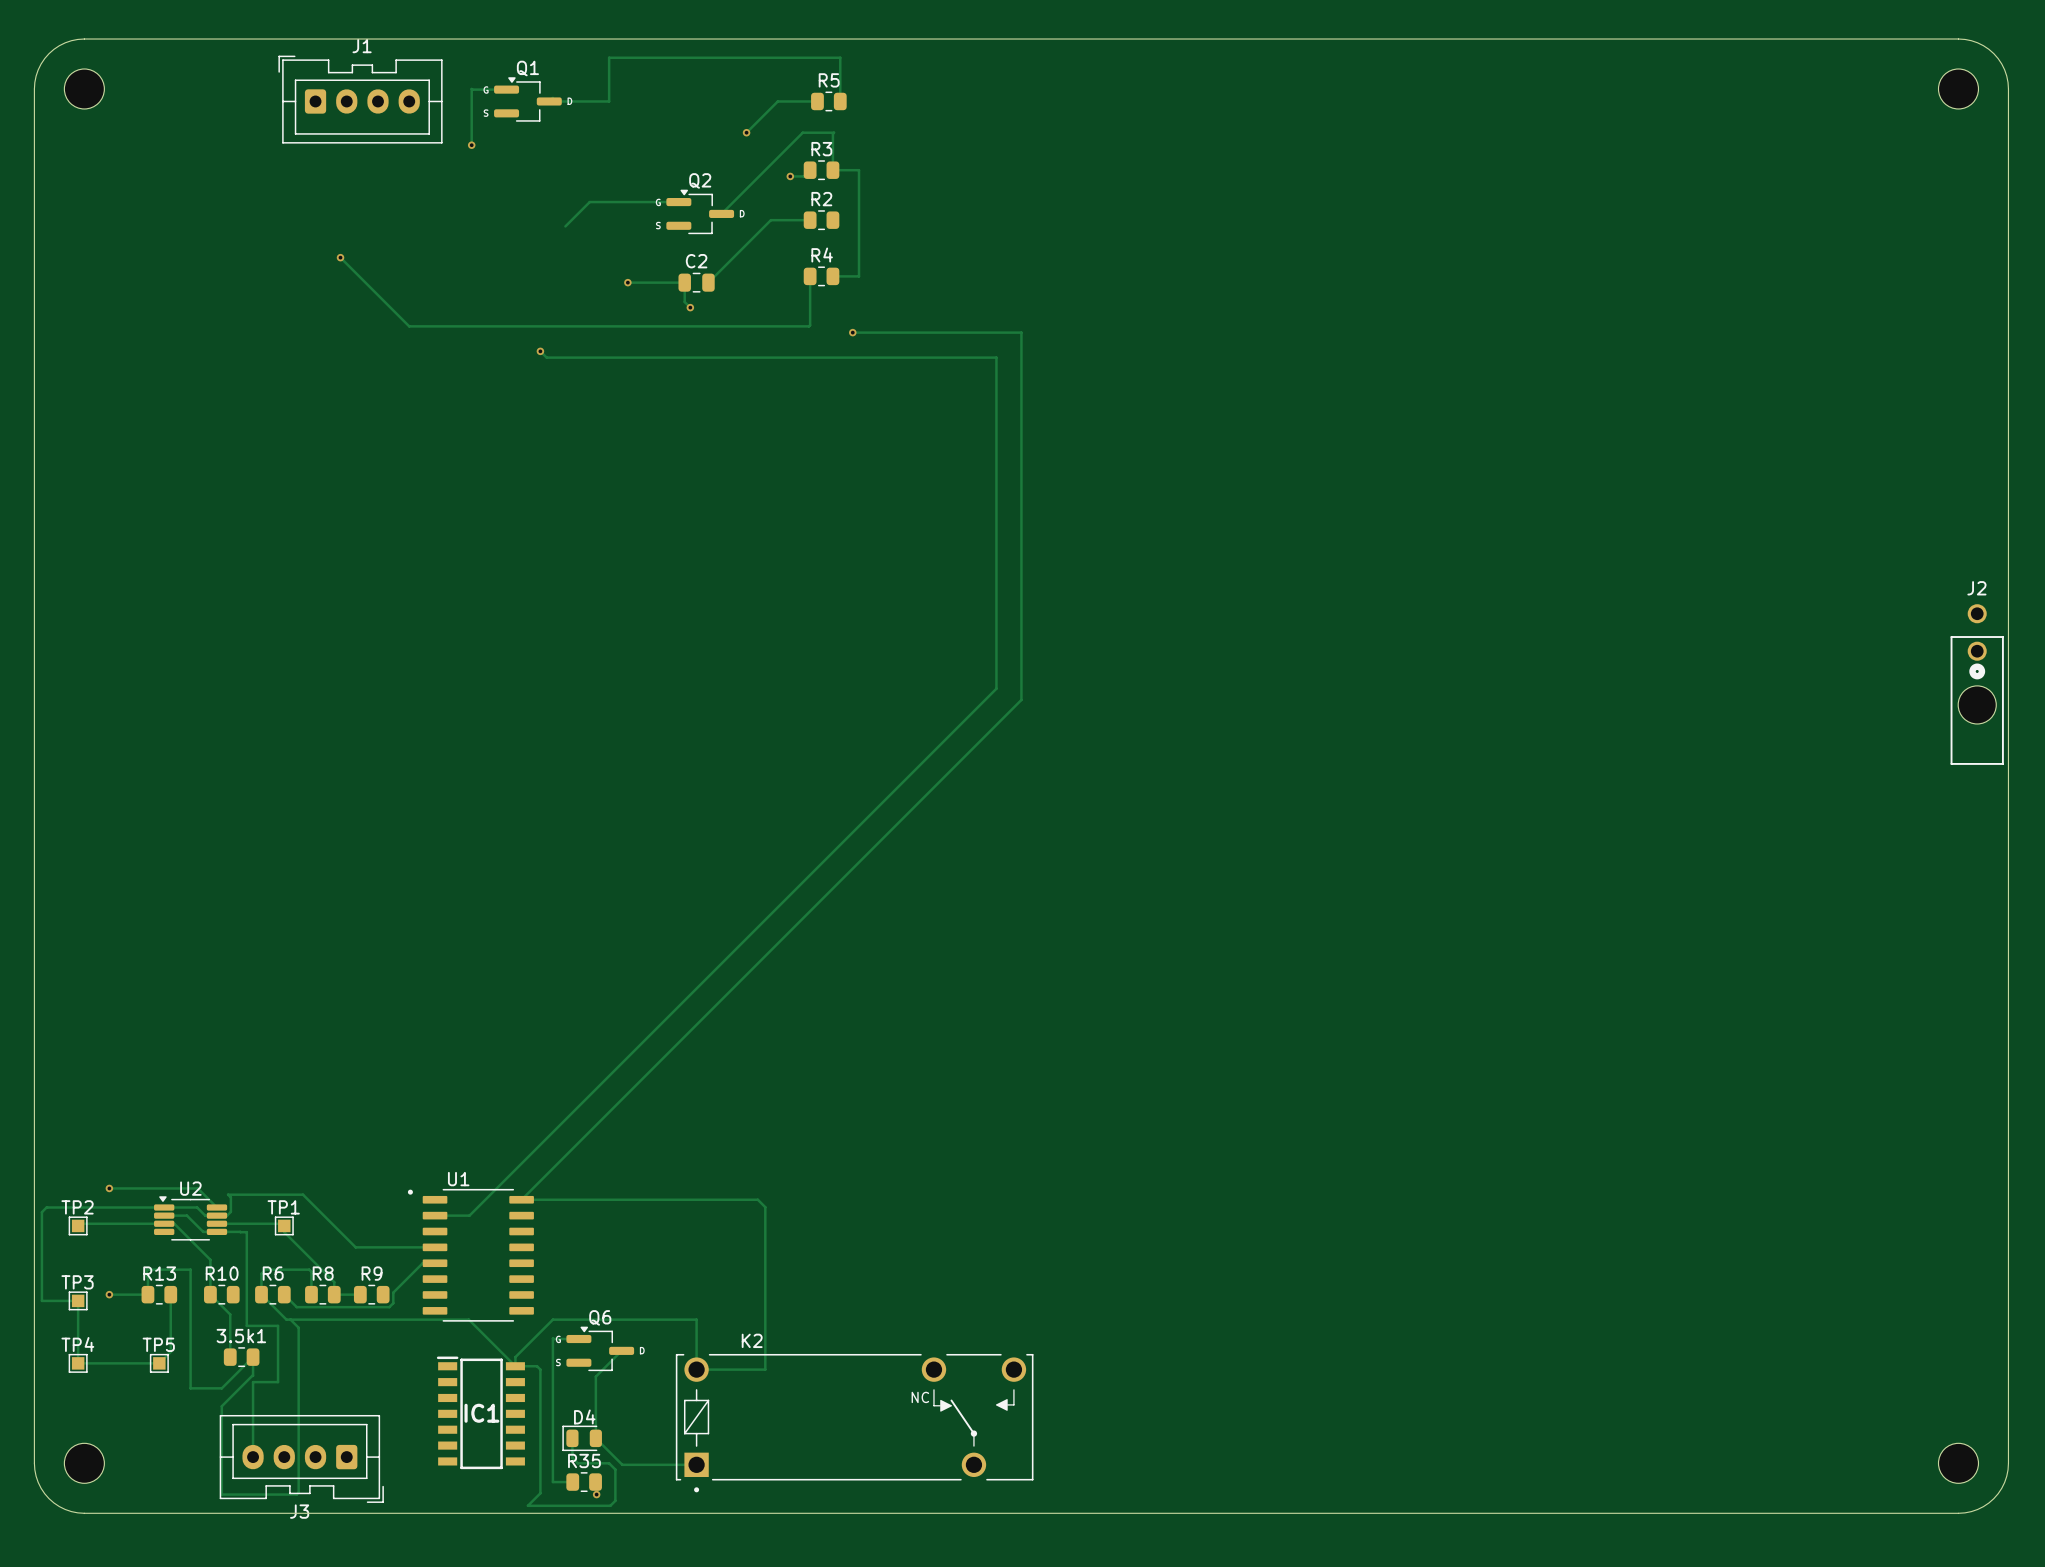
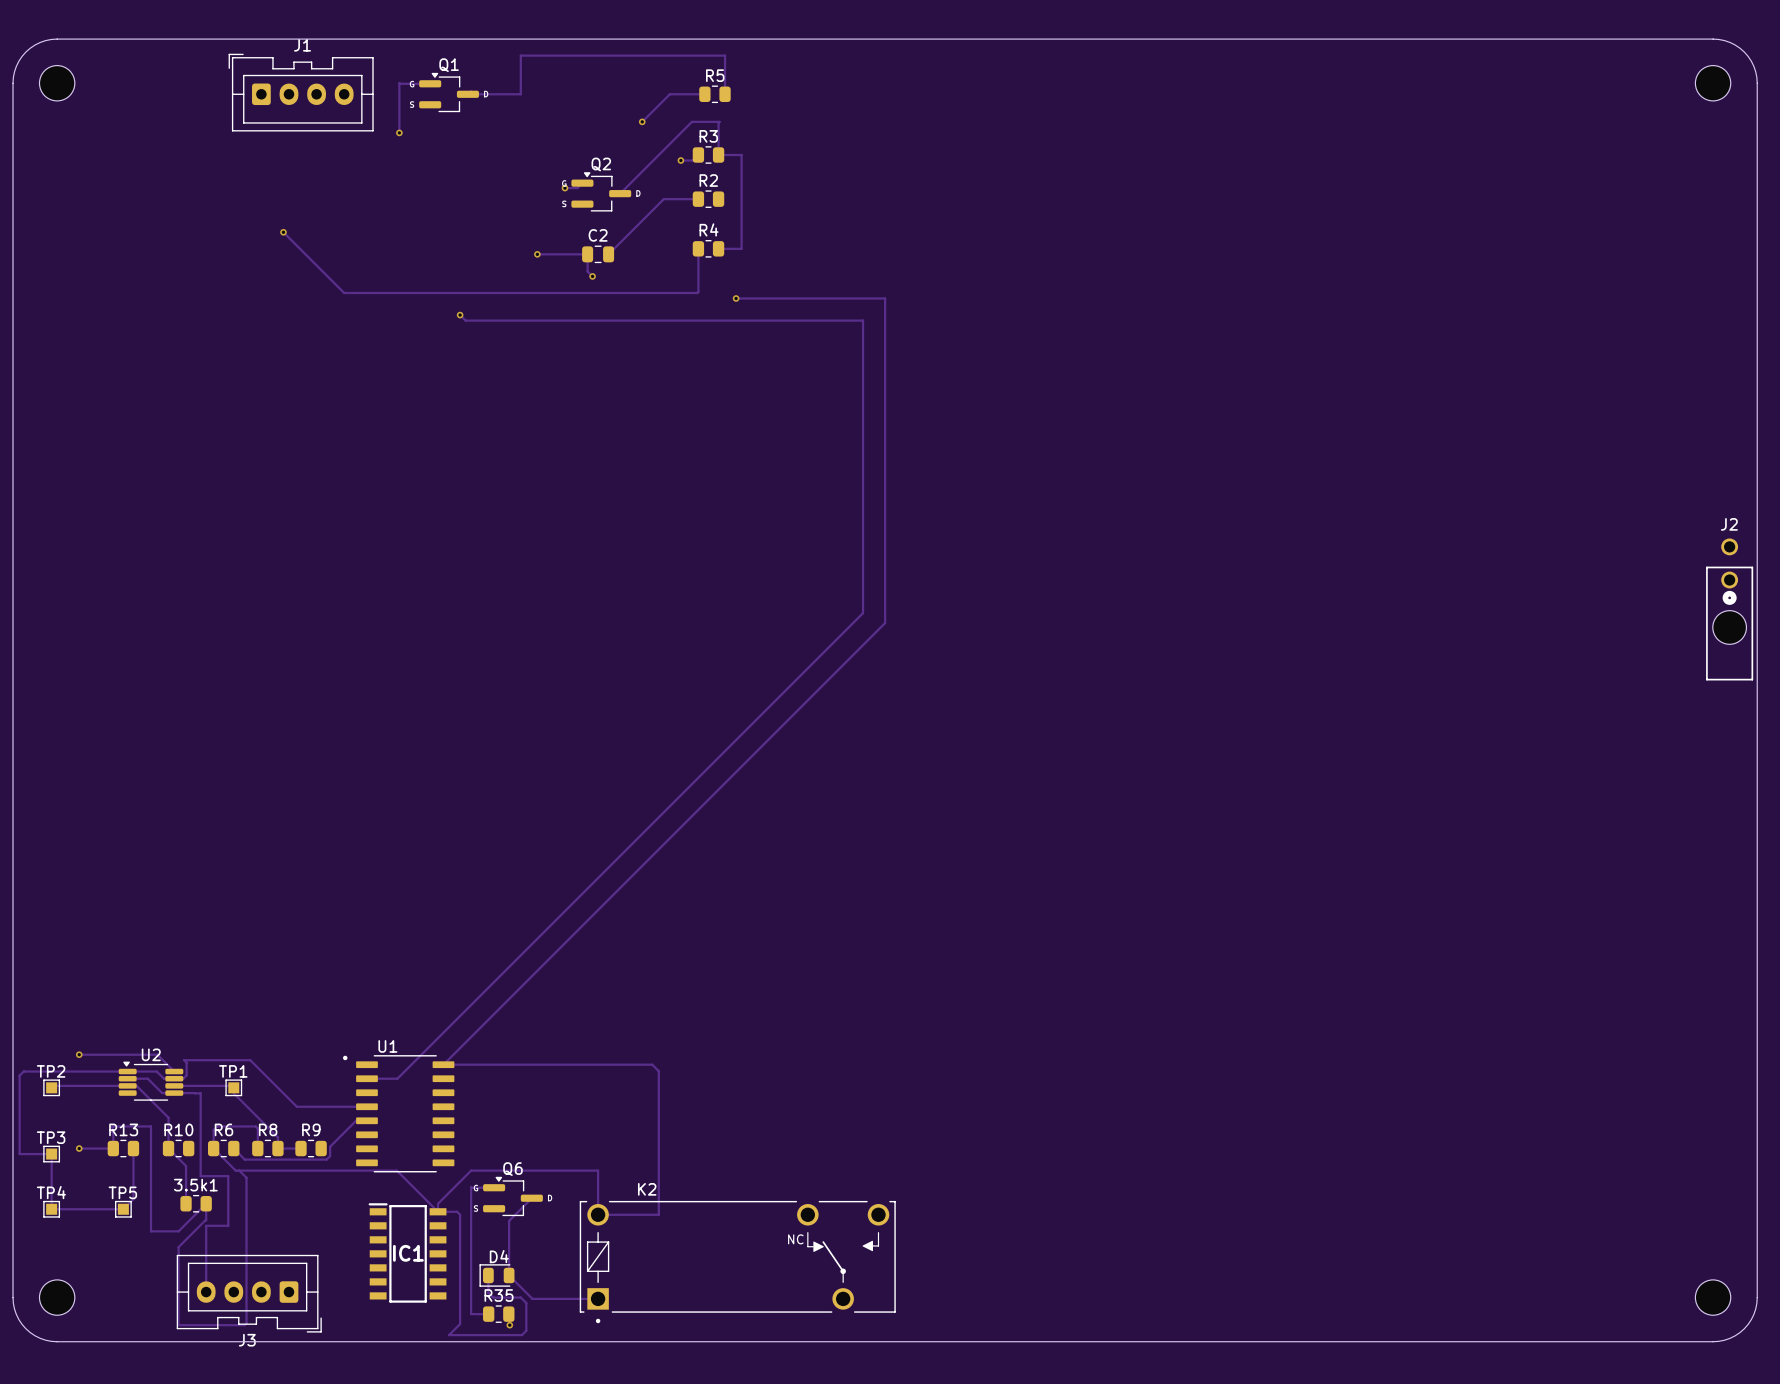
track: (678, 202) (589, 202) (565, 226) -> (582, 183) (577, 188) (564, 188)
via: none -> (564, 188)

